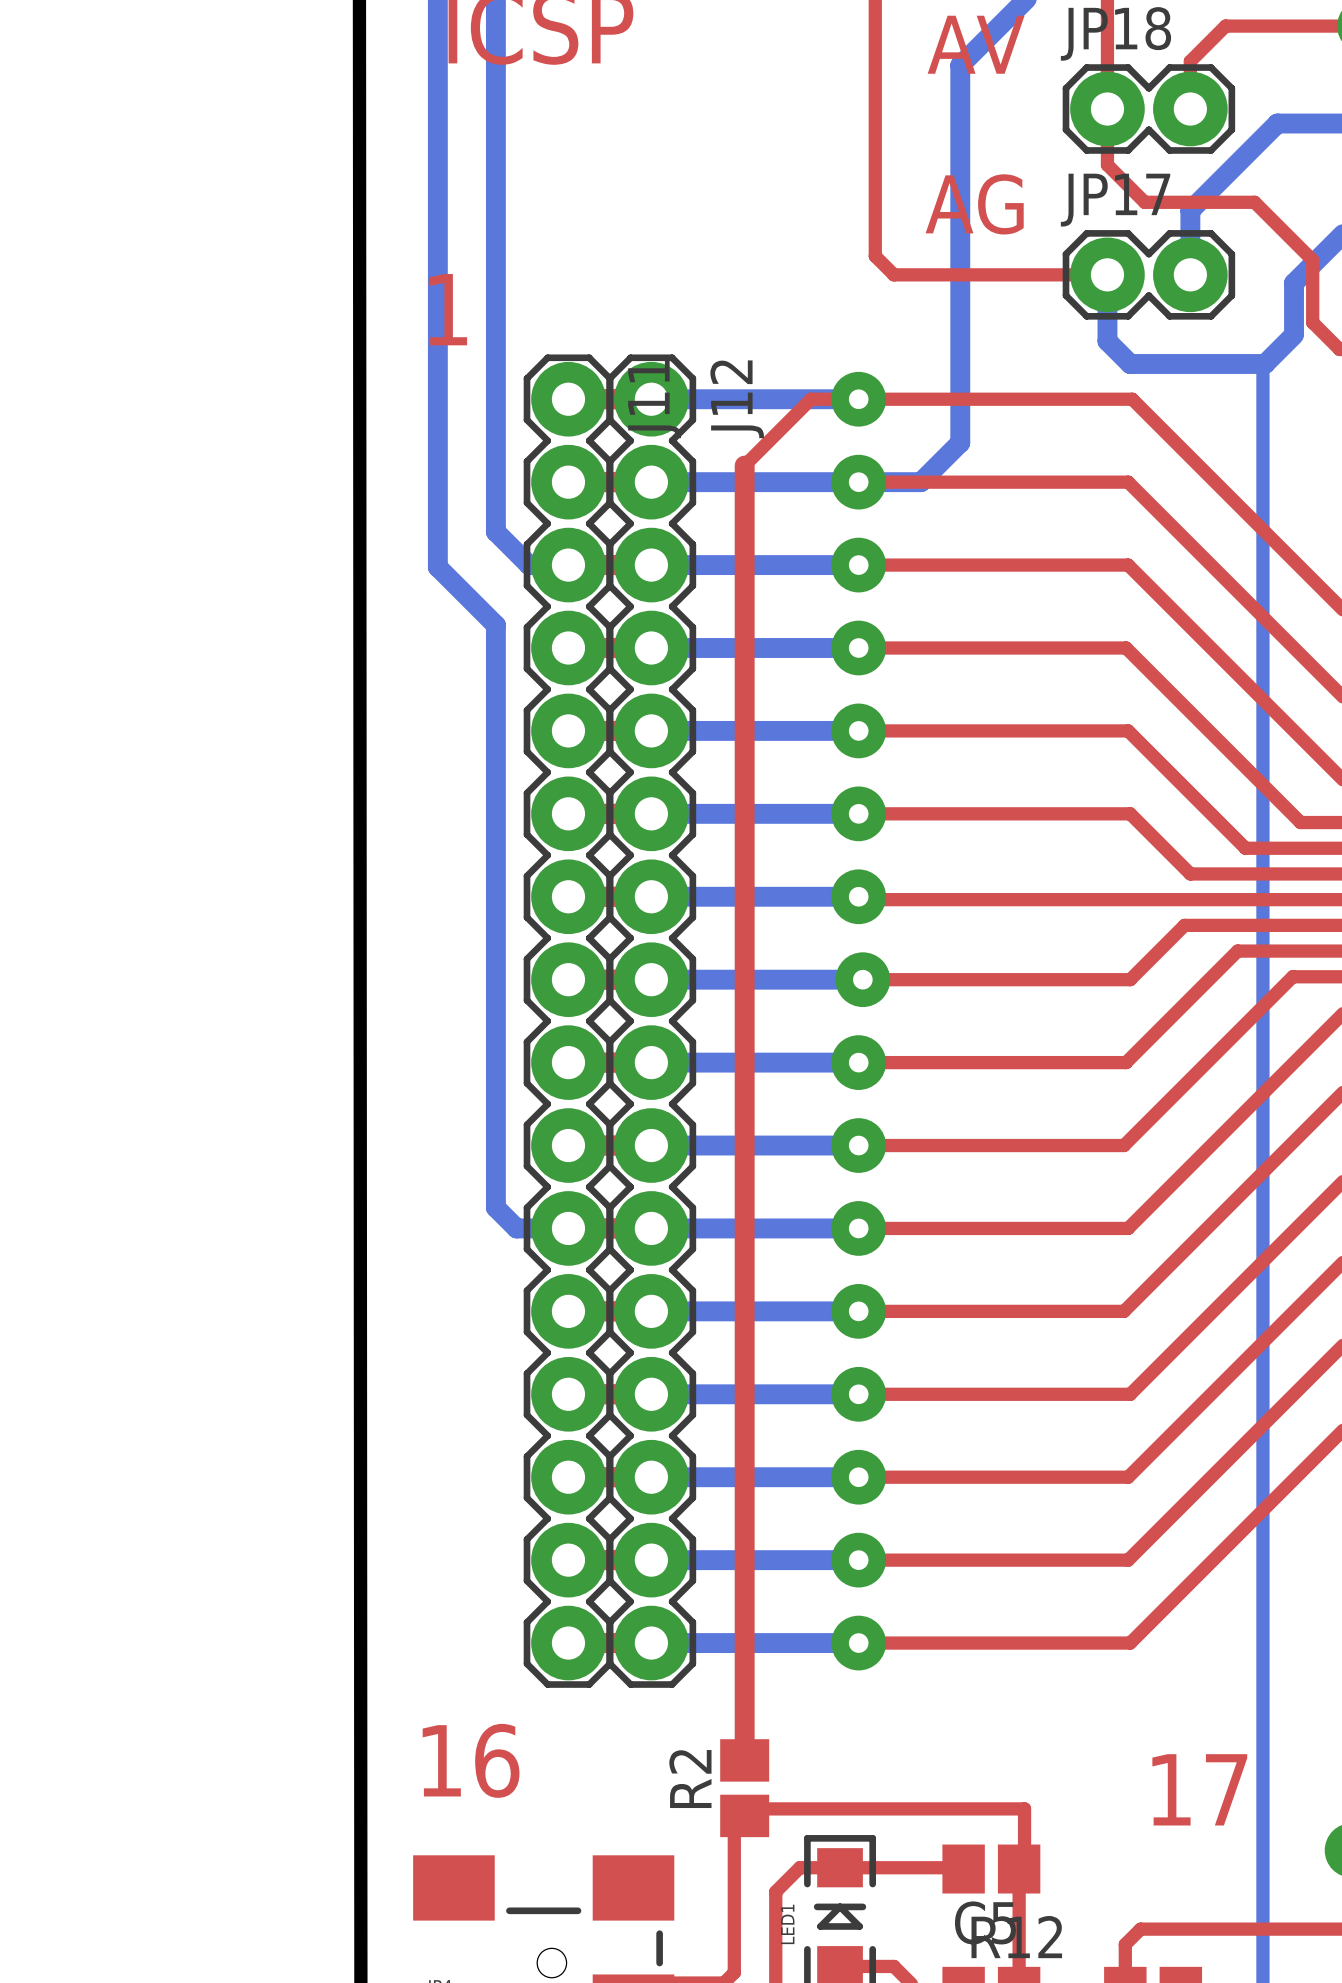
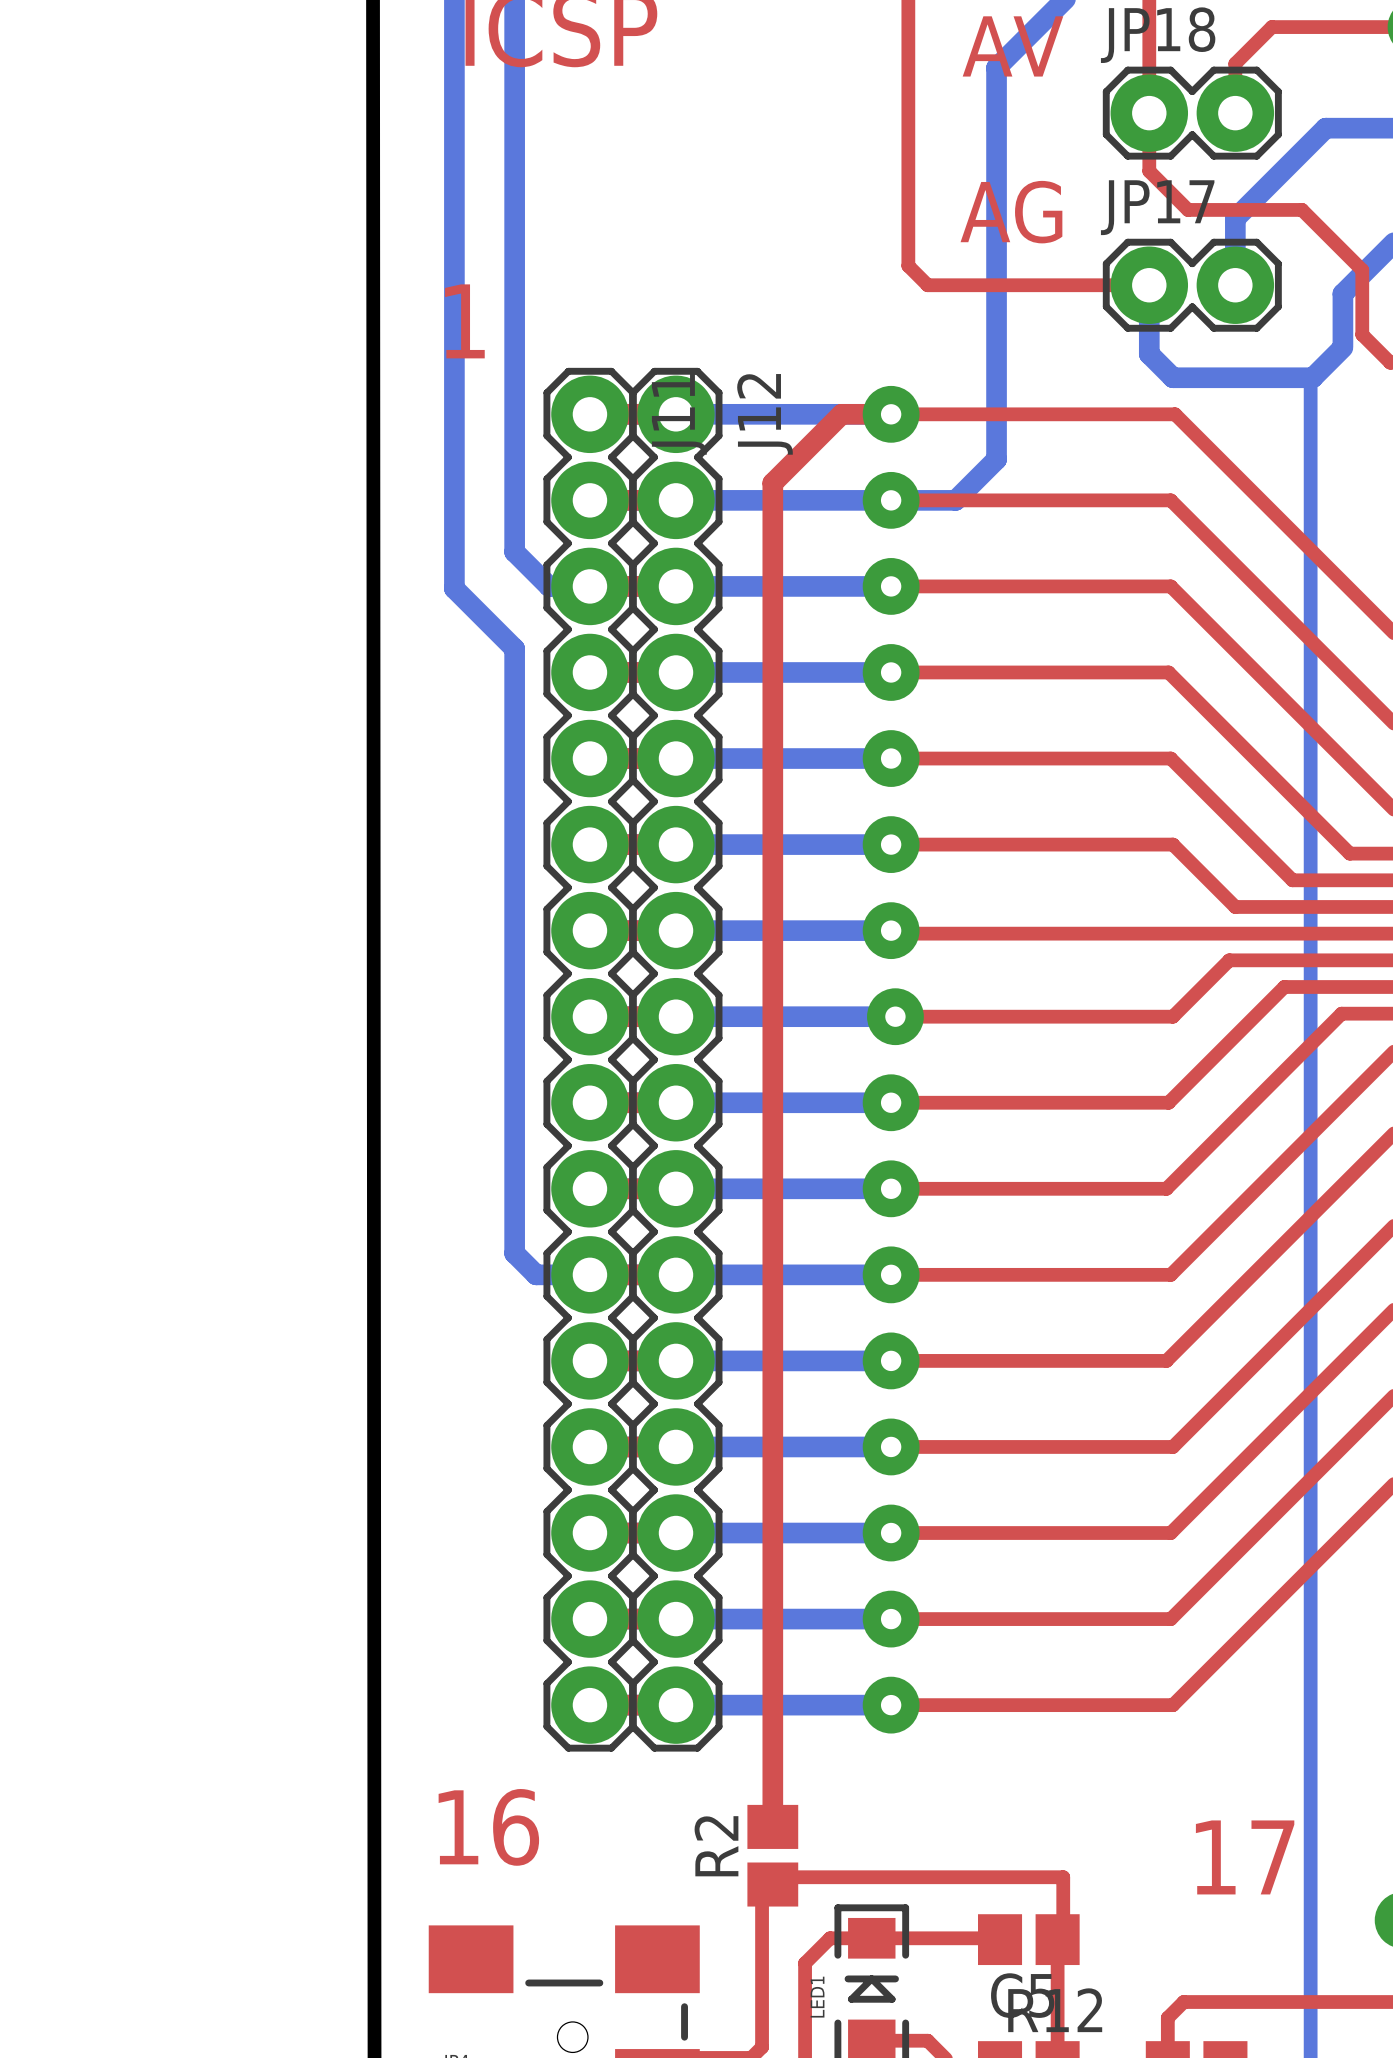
top track width: thin (858, 399) (811, 399) (744, 465) -> thick (891, 414) (841, 414) (772, 483)

